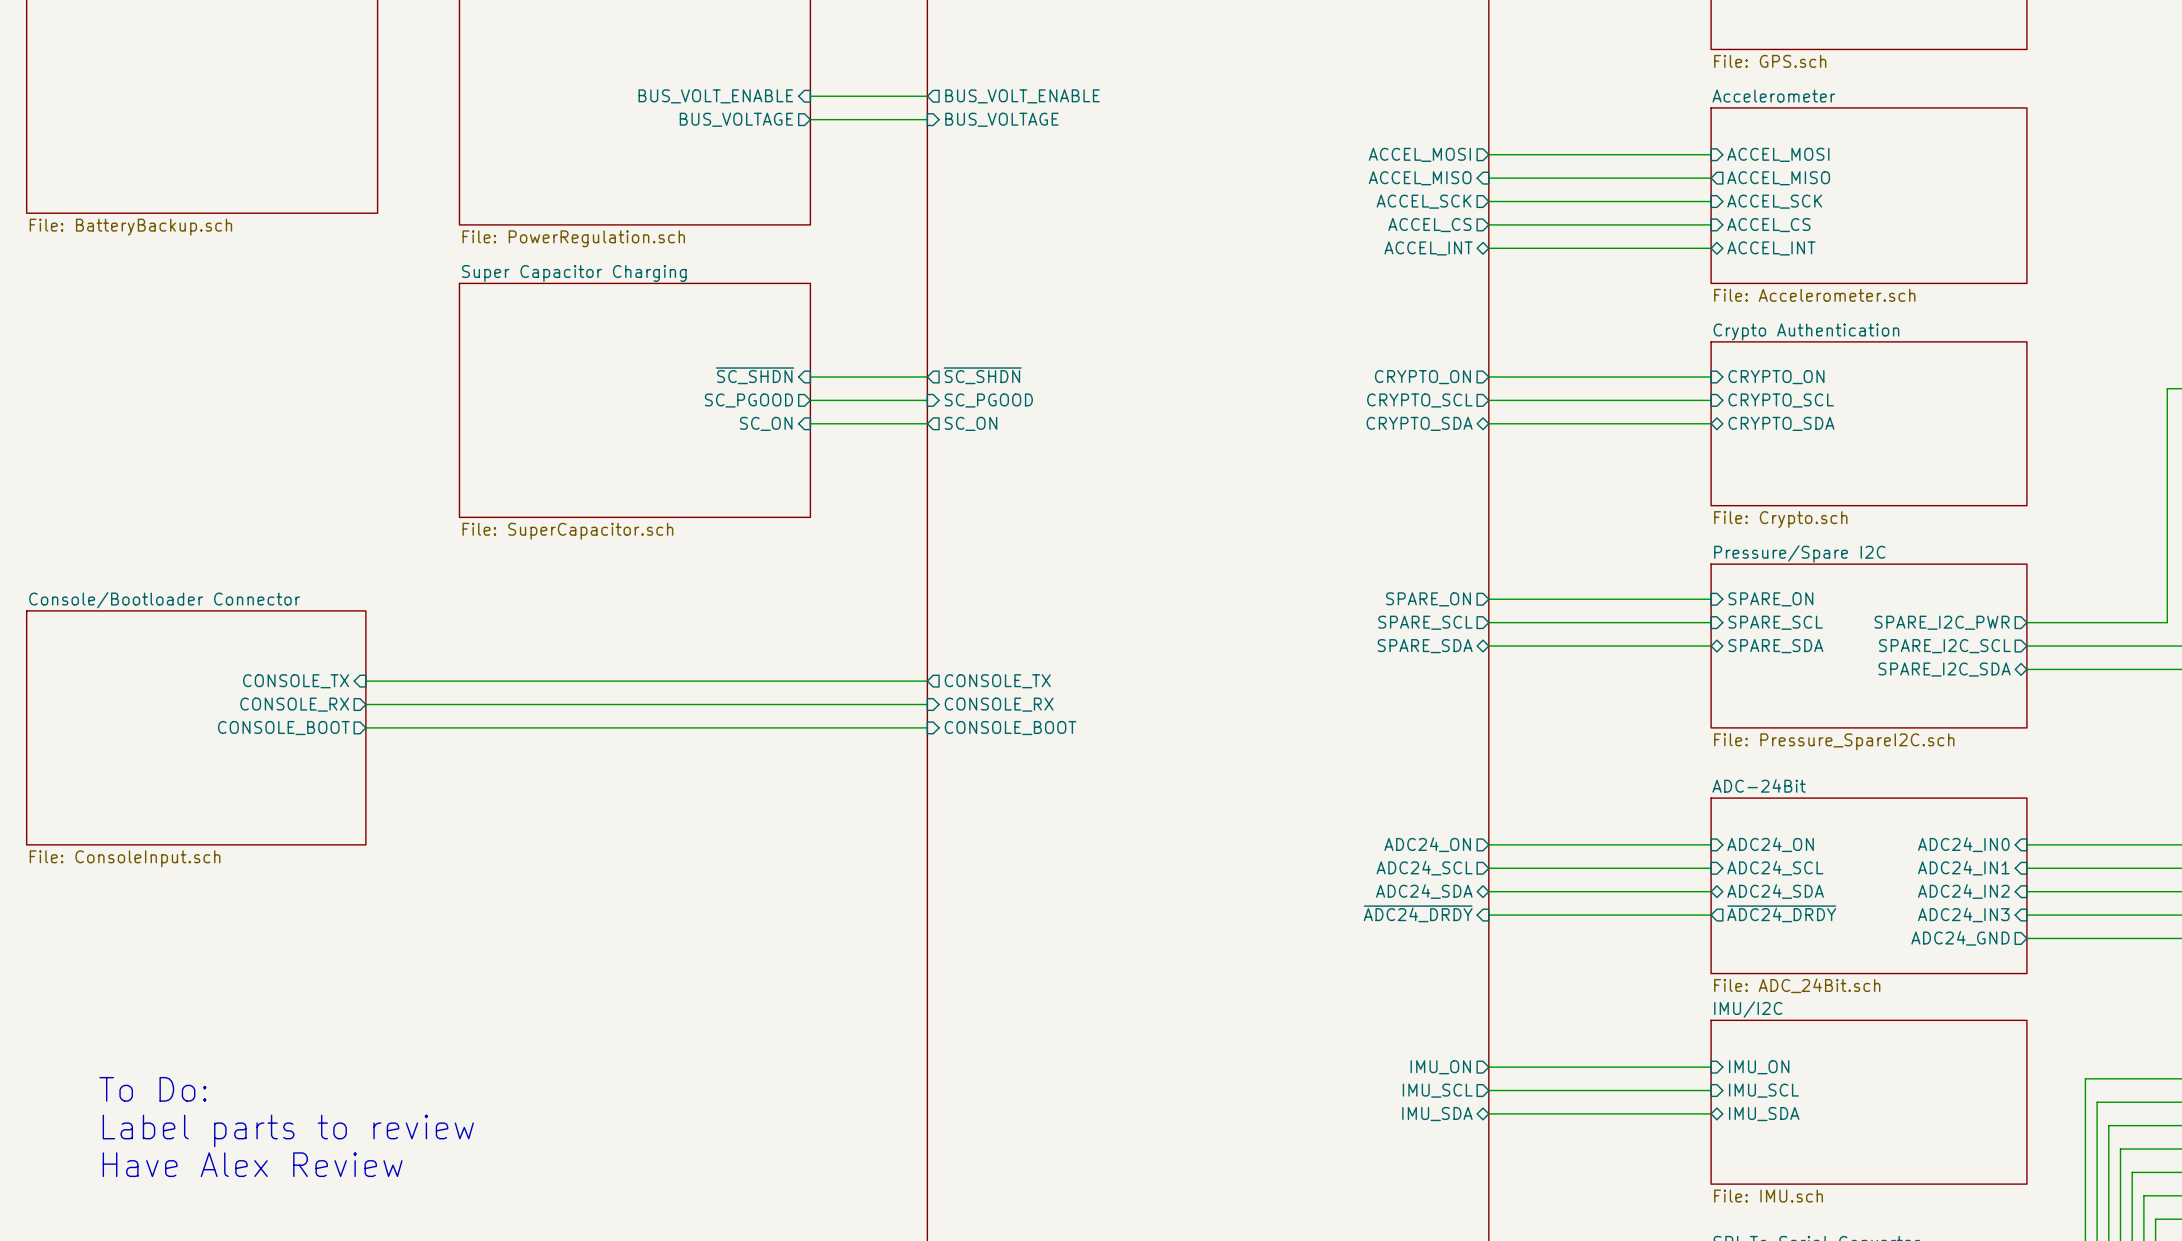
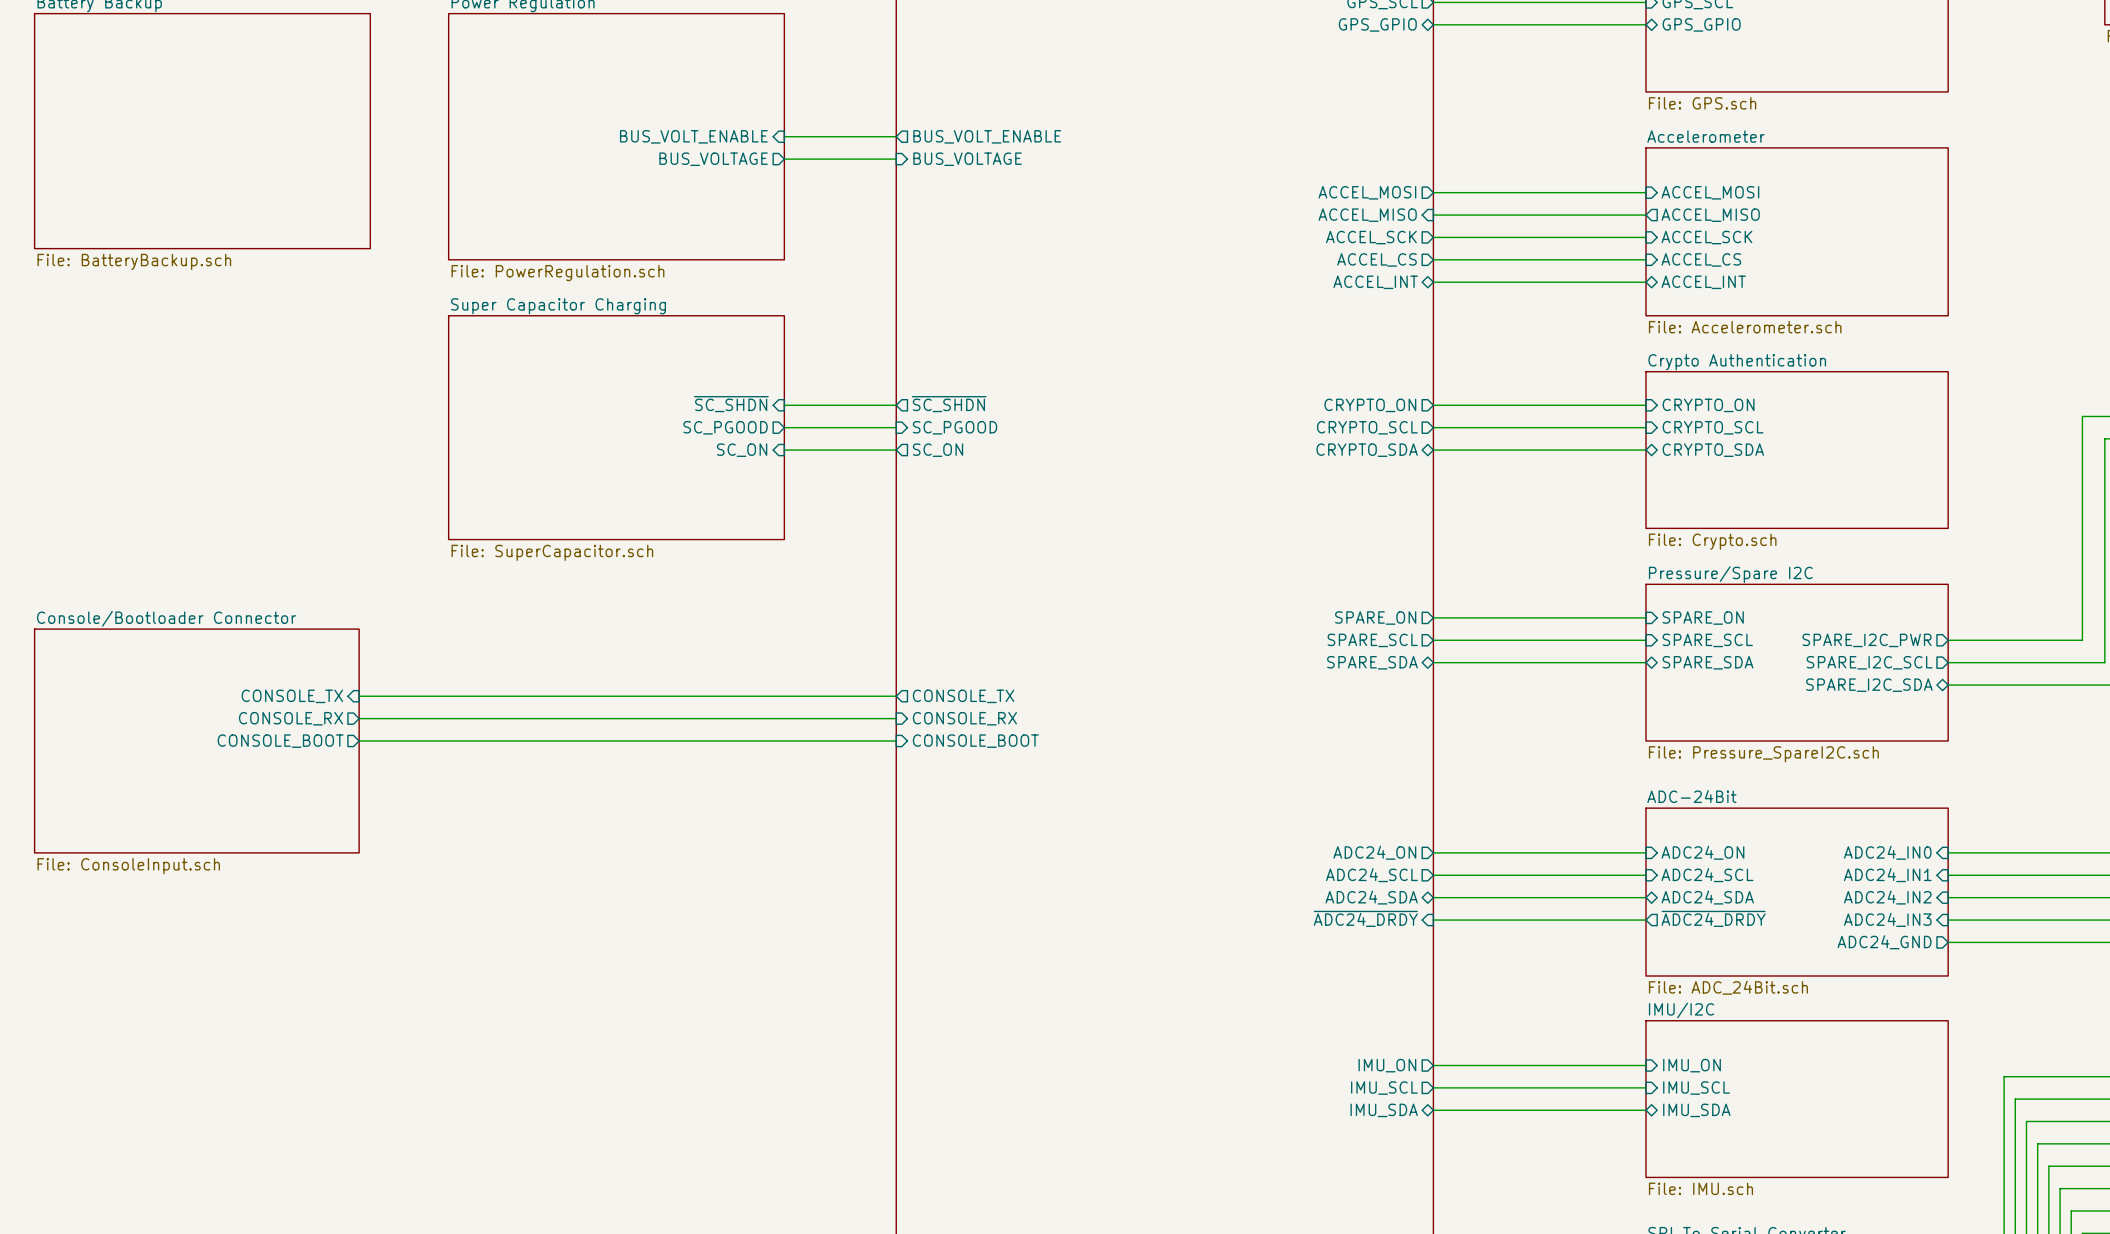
text: To Do: (152, 1089) -> none
text: Label parts to review (288, 1130) -> none
text: Have Alex Review (252, 1164) -> none

